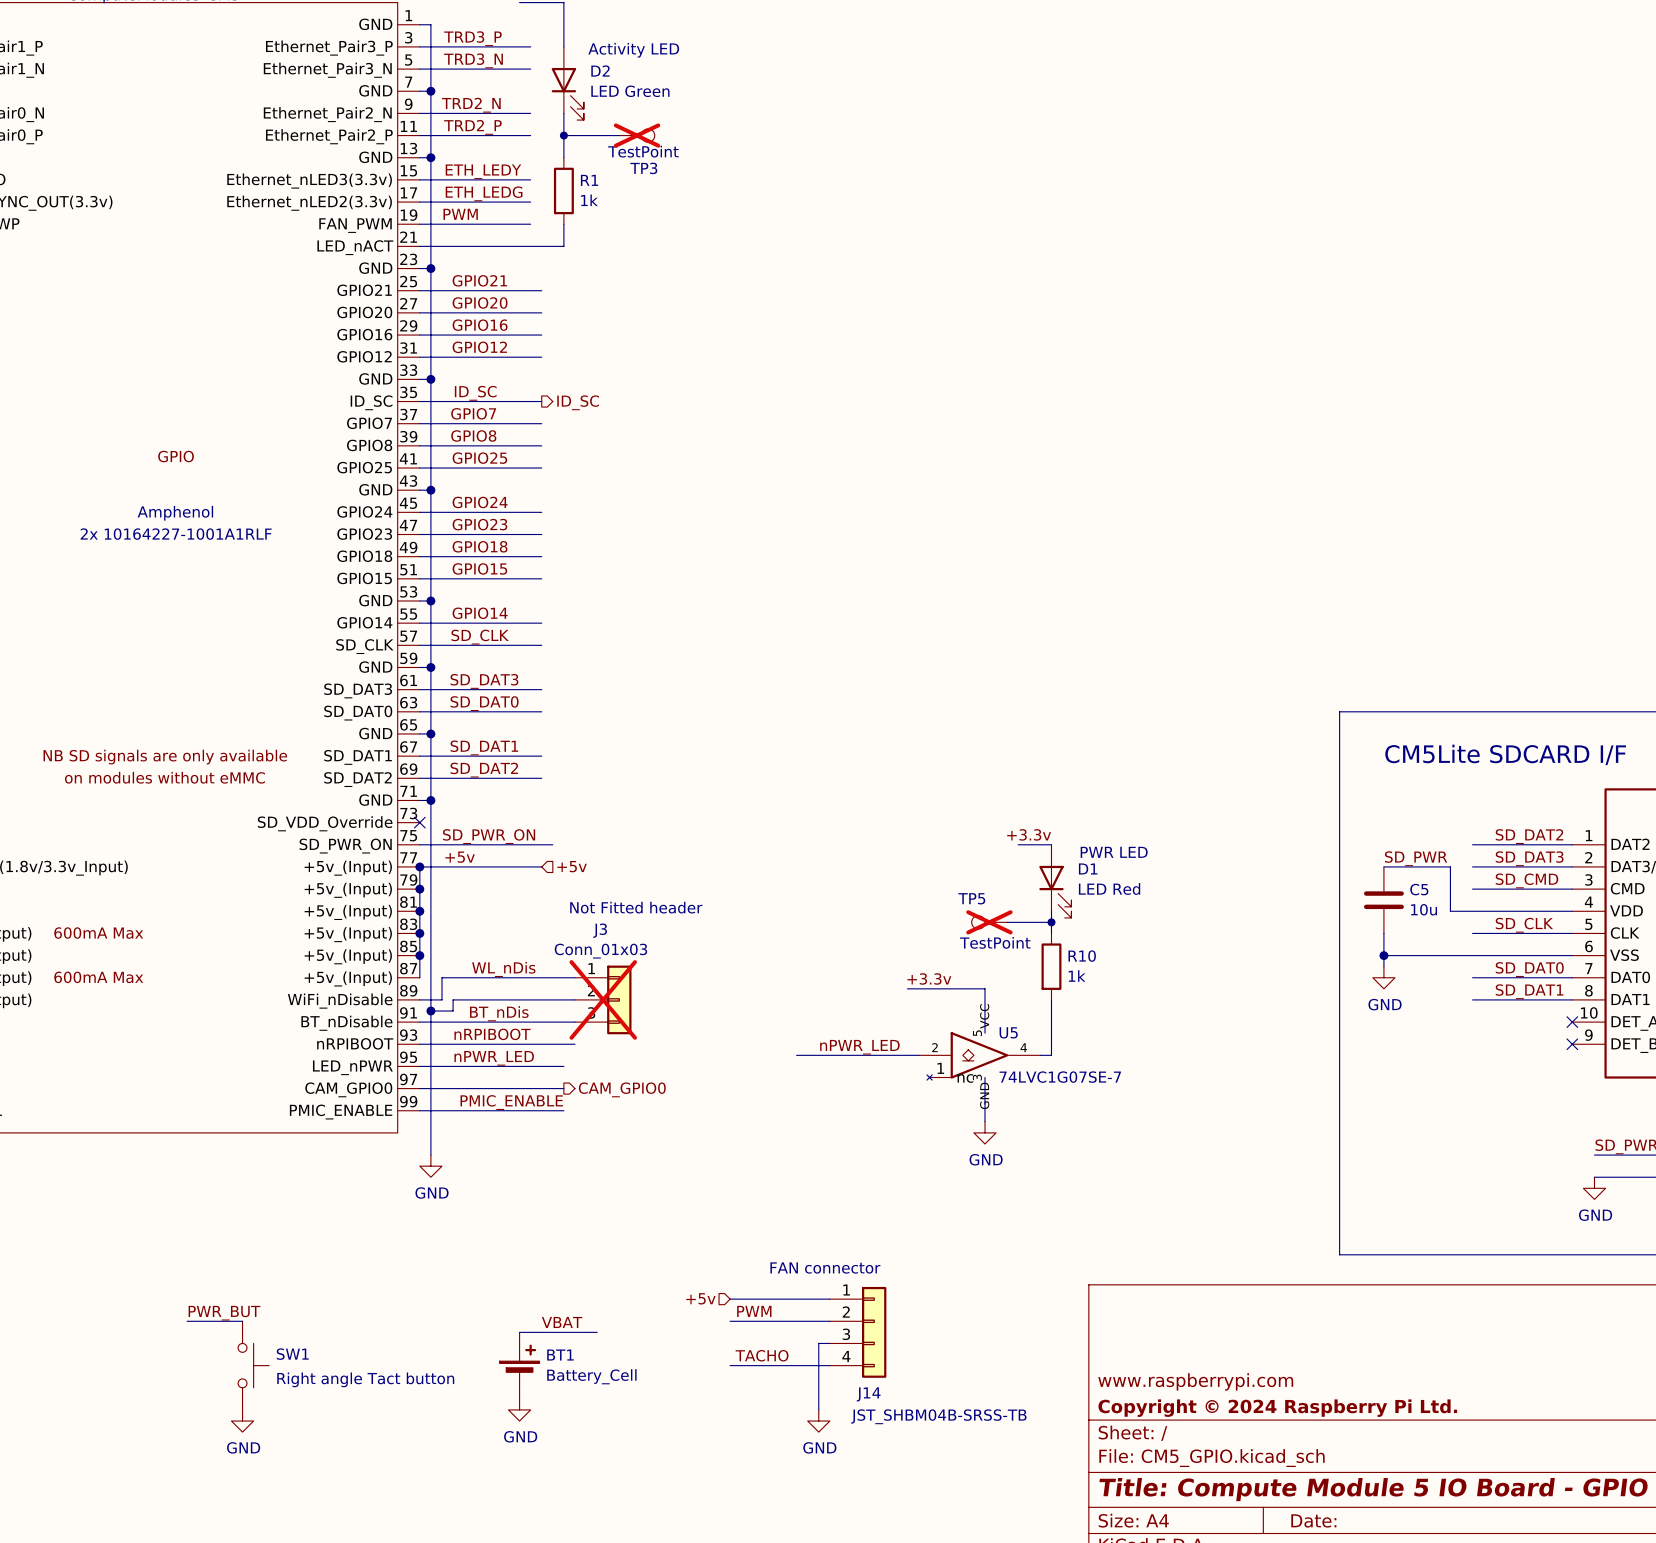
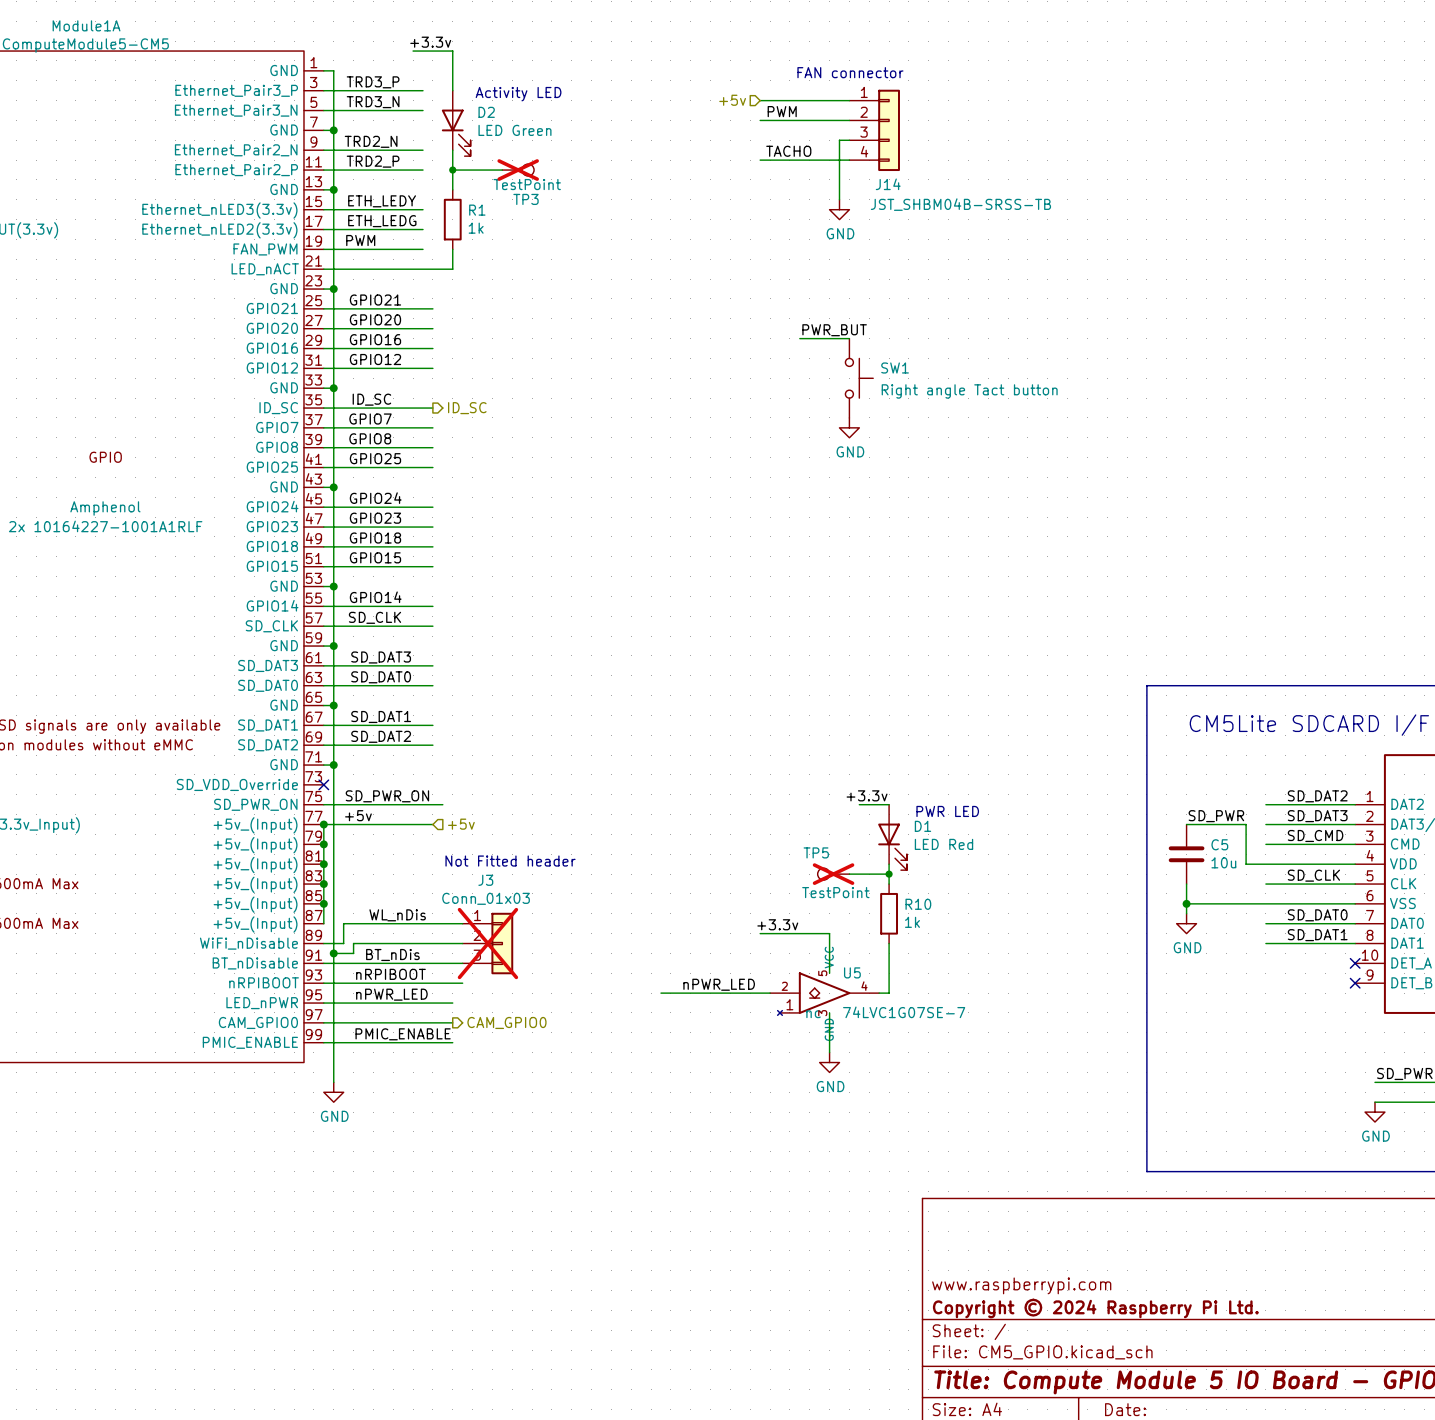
text: none -> FAN connector (850, 72)
hierarchical label: none -> +5v (732, 100)
wire: none -> (760, 100) (849, 100)
label: none -> PWM (782, 111)
wire: none -> (760, 120) (849, 120)
wire: none -> (849, 140) (839, 140) (839, 199)
label: none -> TACHO (788, 151)
wire: none -> (760, 160) (849, 160)
power symbol: none -> GND (839, 209)
label: none -> PWR_BUT (834, 330)
wire: none -> (799, 338) (849, 338)
power symbol: none -> GND (849, 427)
text: FAN connector (825, 1268) -> none
hierarchical label: +5v (700, 1298) -> none
wire: (730, 1299) (829, 1299) -> none
label: PWM (754, 1311) -> none
label: PWR_BUT (224, 1313) -> none
wire: (187, 1321) (242, 1321) -> none
wire: (730, 1321) (829, 1321) -> none
label: VBAT (562, 1322) -> none
wire: (519, 1332) (597, 1332) -> none
J14 position: (858, 1332) -> (874, 130)
wire: (829, 1343) (818, 1343) (818, 1409) -> none
label: TACHO (762, 1355) -> none
SW1 position: (253, 1365) -> (859, 378)
BT1: Battery_Cell (519, 1365) -> none
wire: (730, 1365) (829, 1365) -> none
power symbol: GND (519, 1409) -> none
power symbol: GND (242, 1421) -> none
power symbol: GND (818, 1421) -> none

